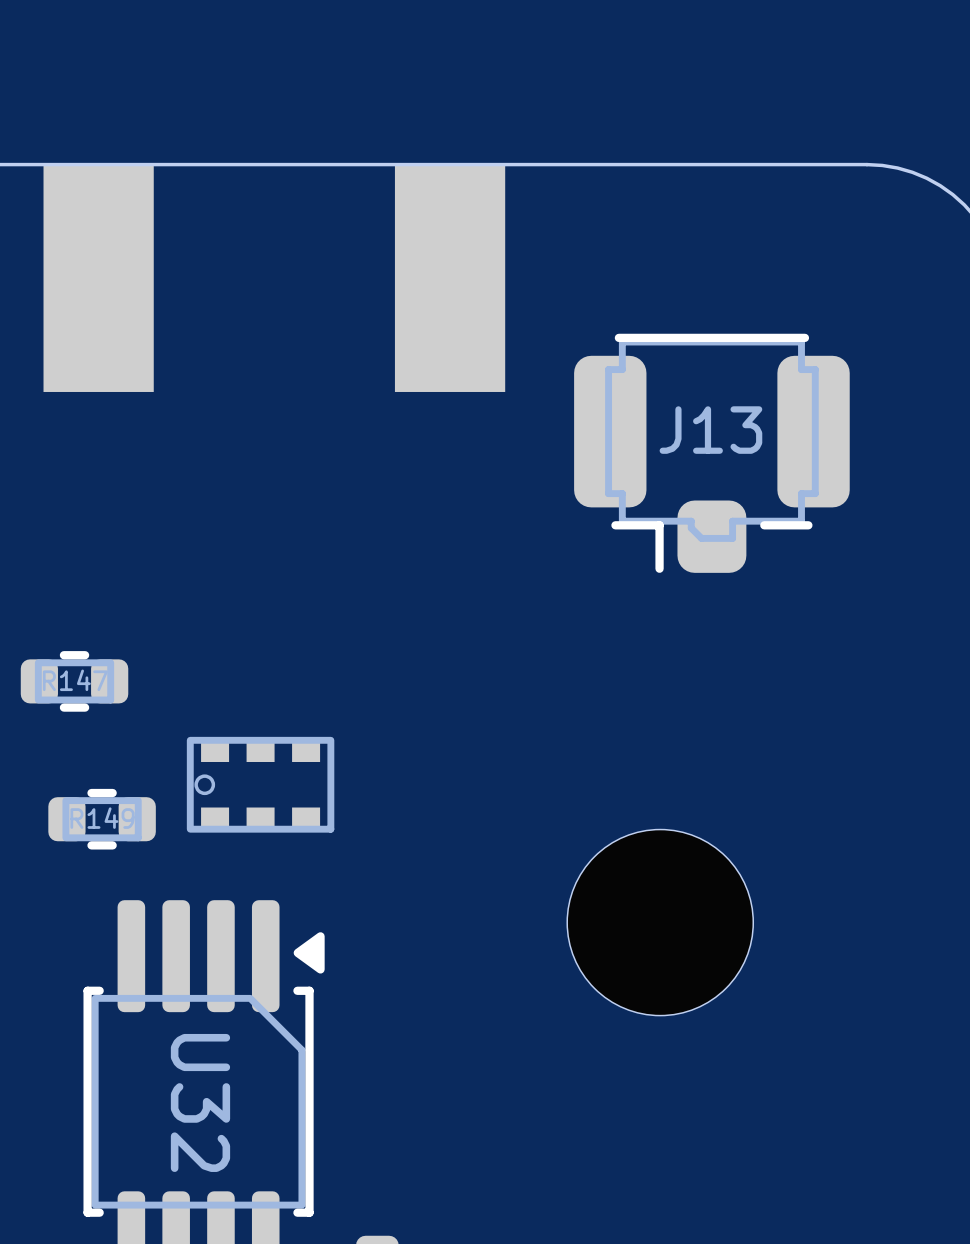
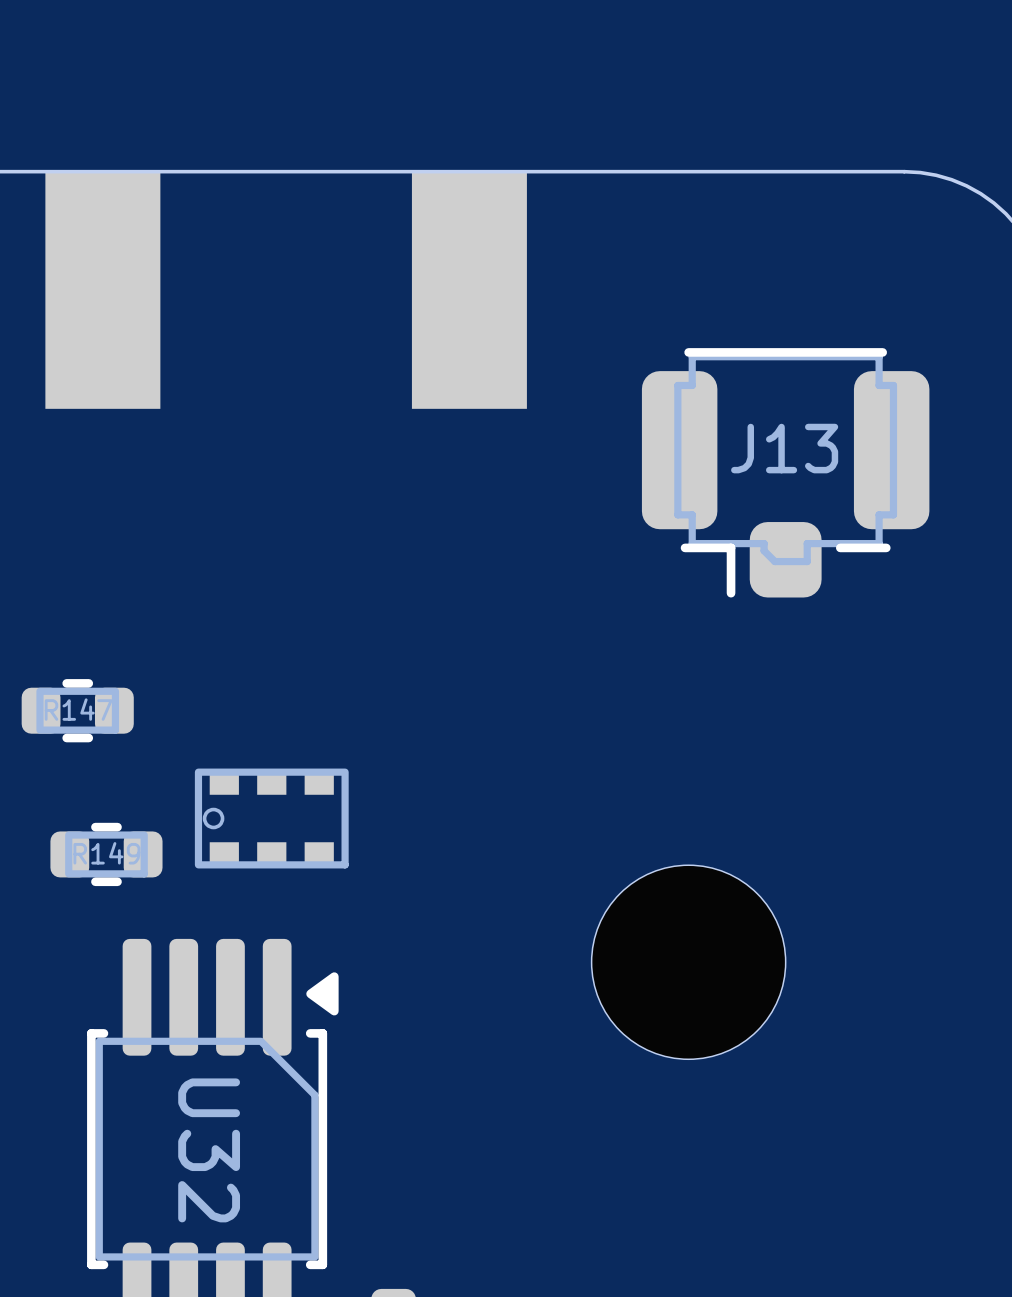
J13 position: (711, 453) -> (785, 472)

